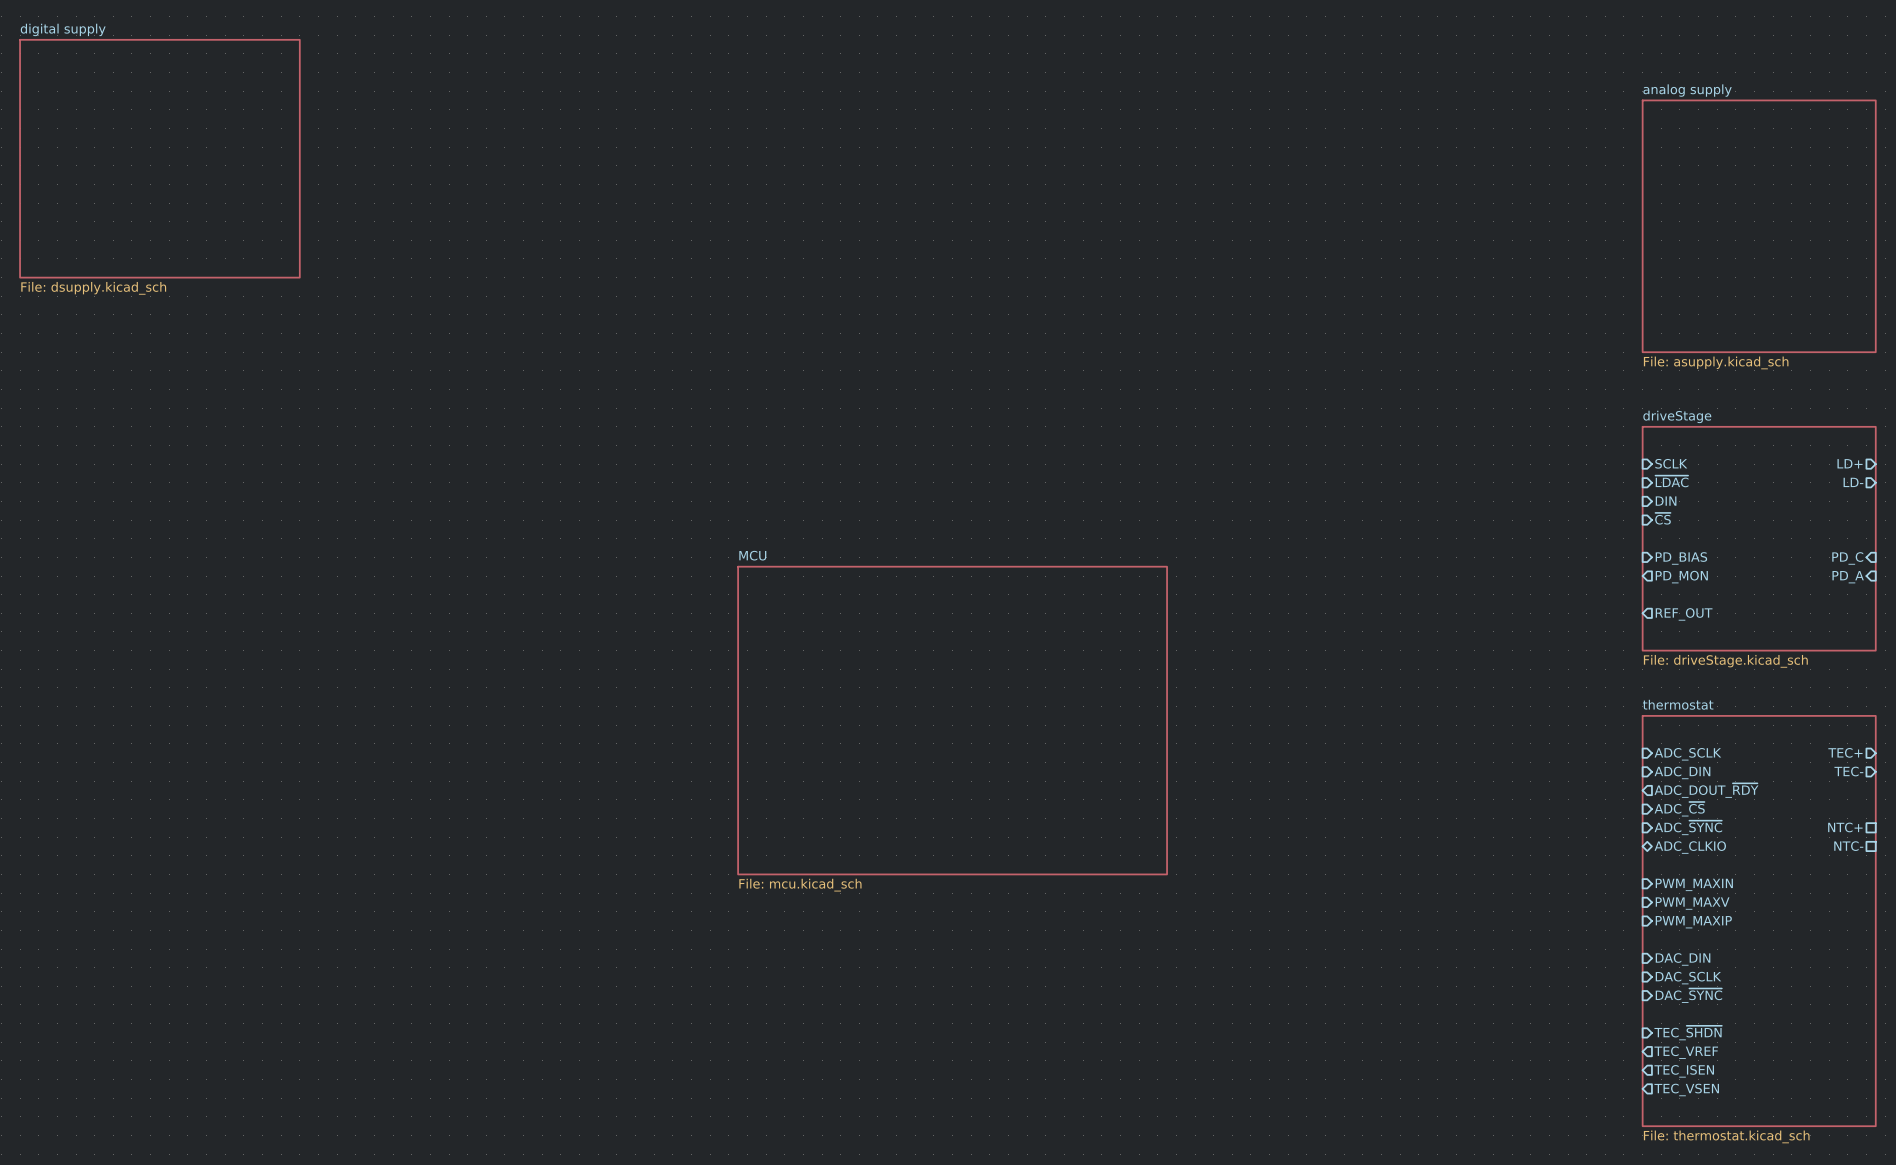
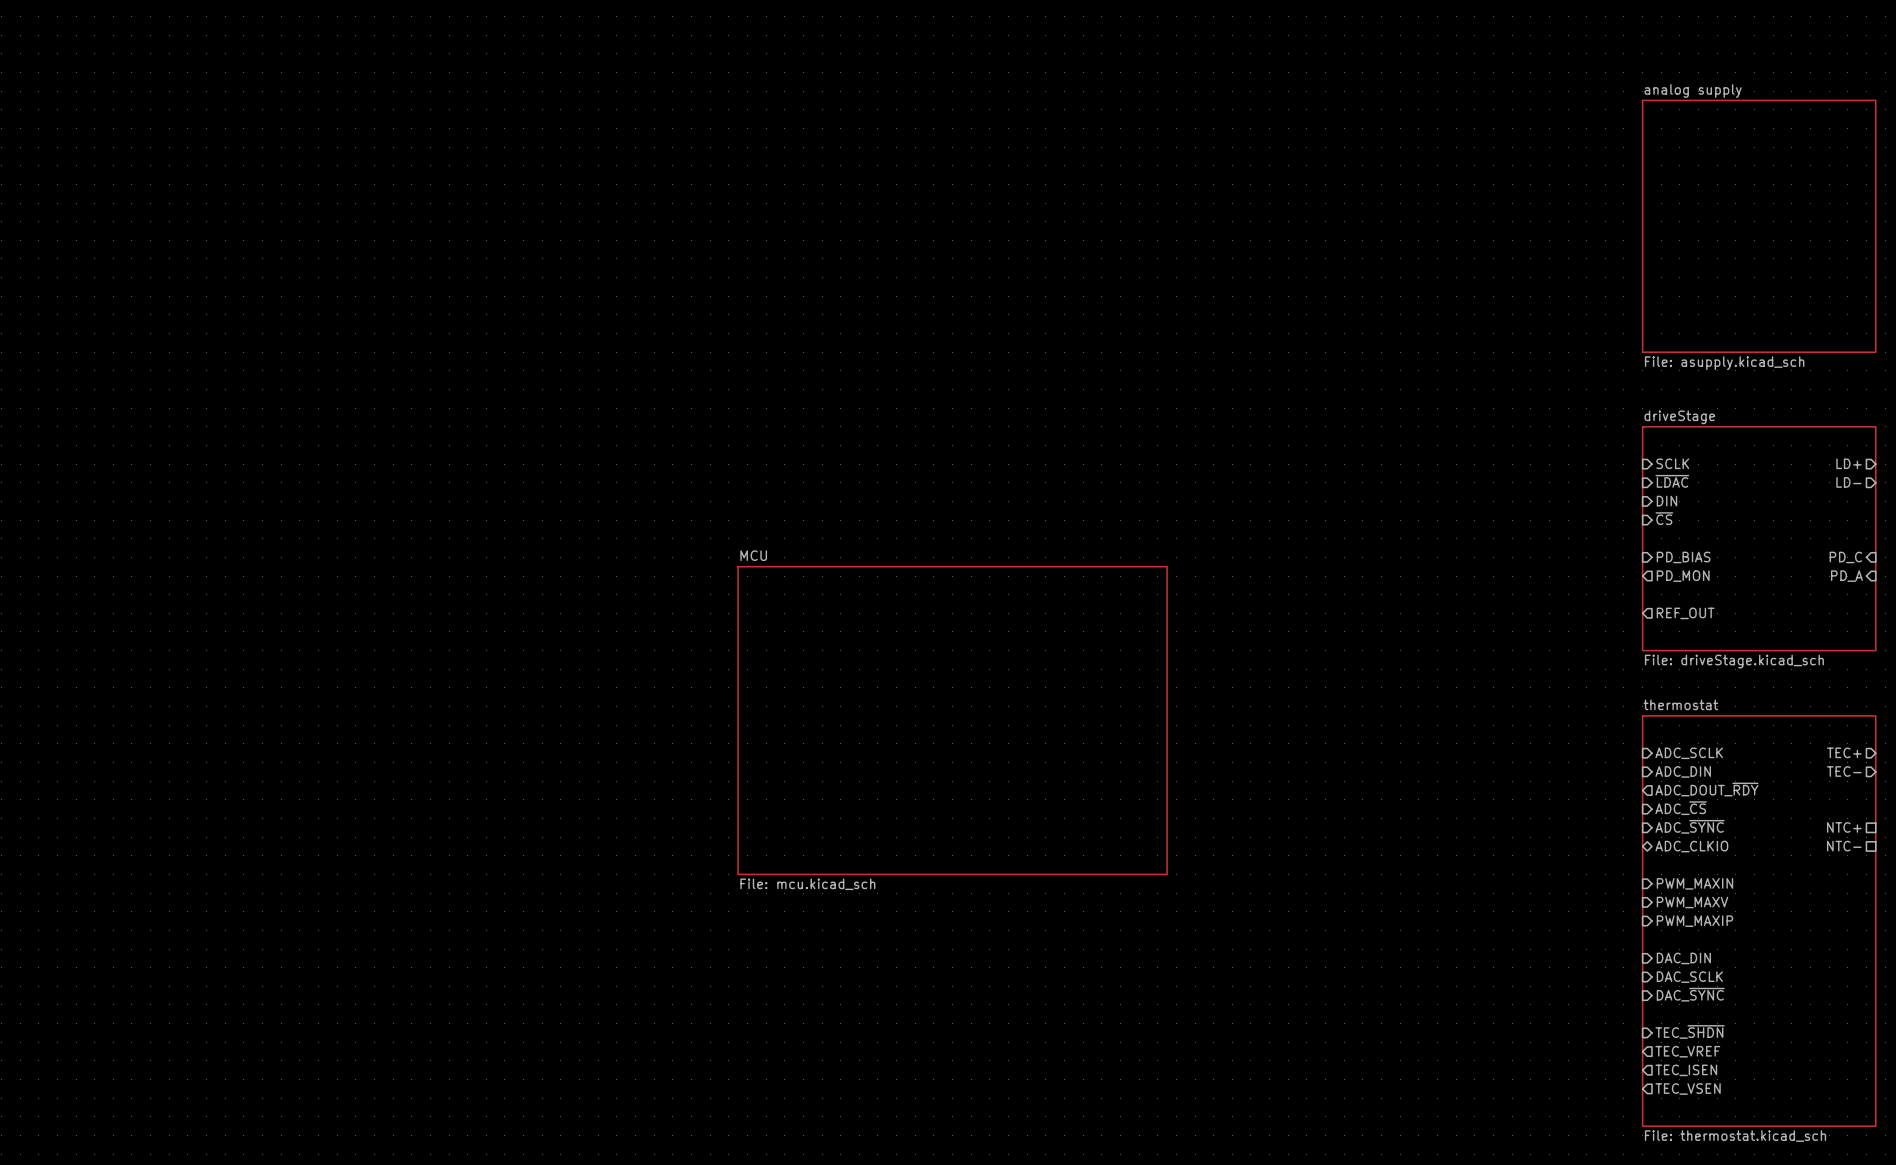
sheet digital supply: File: dsupply.kicad_sch (159, 158) -> none

